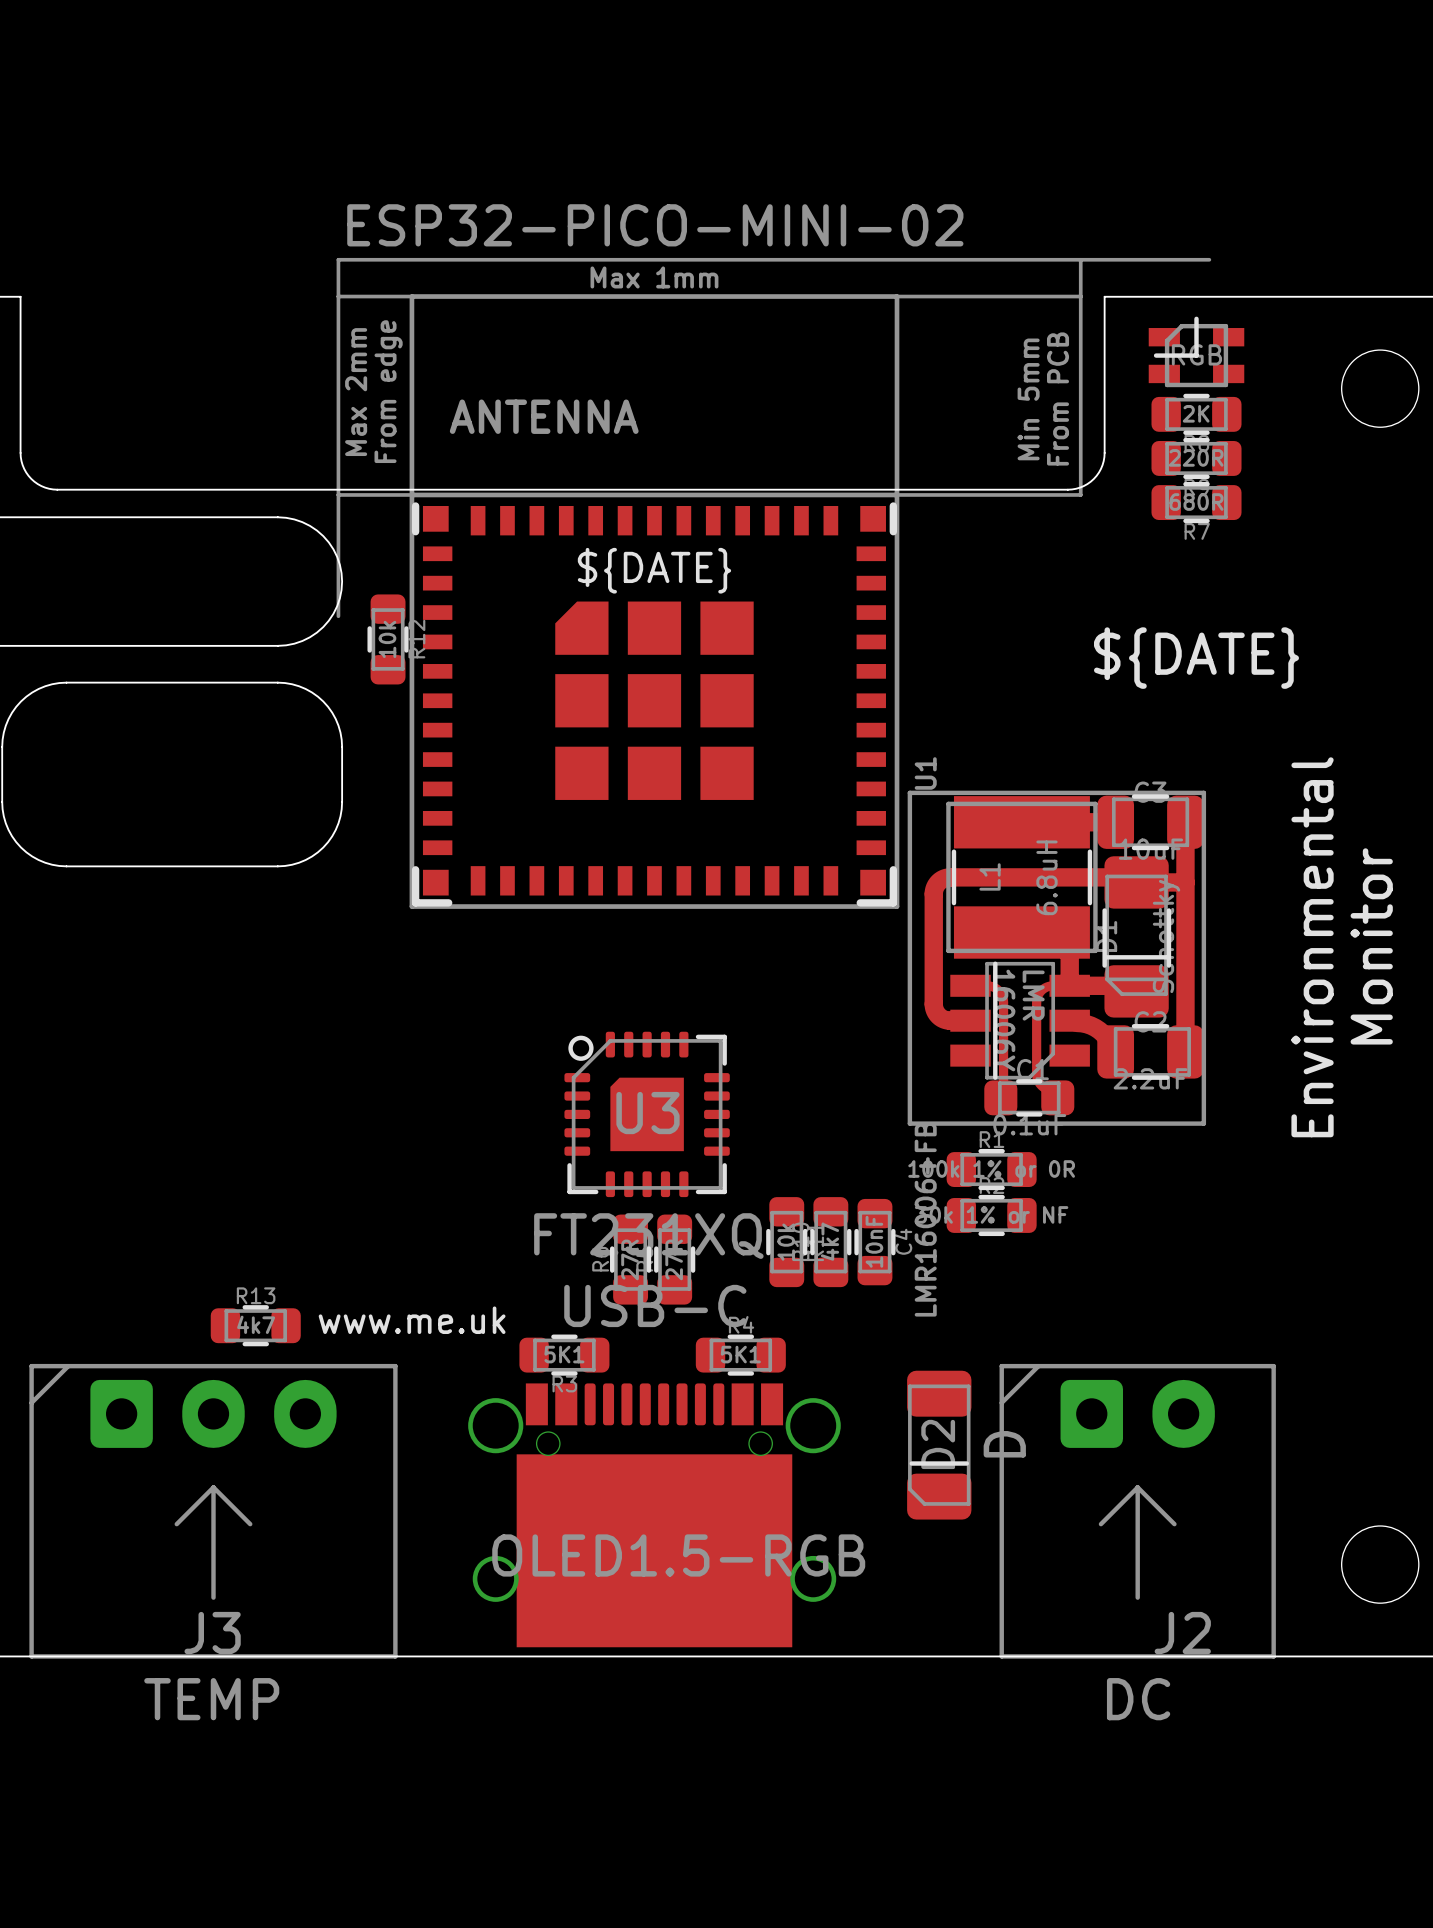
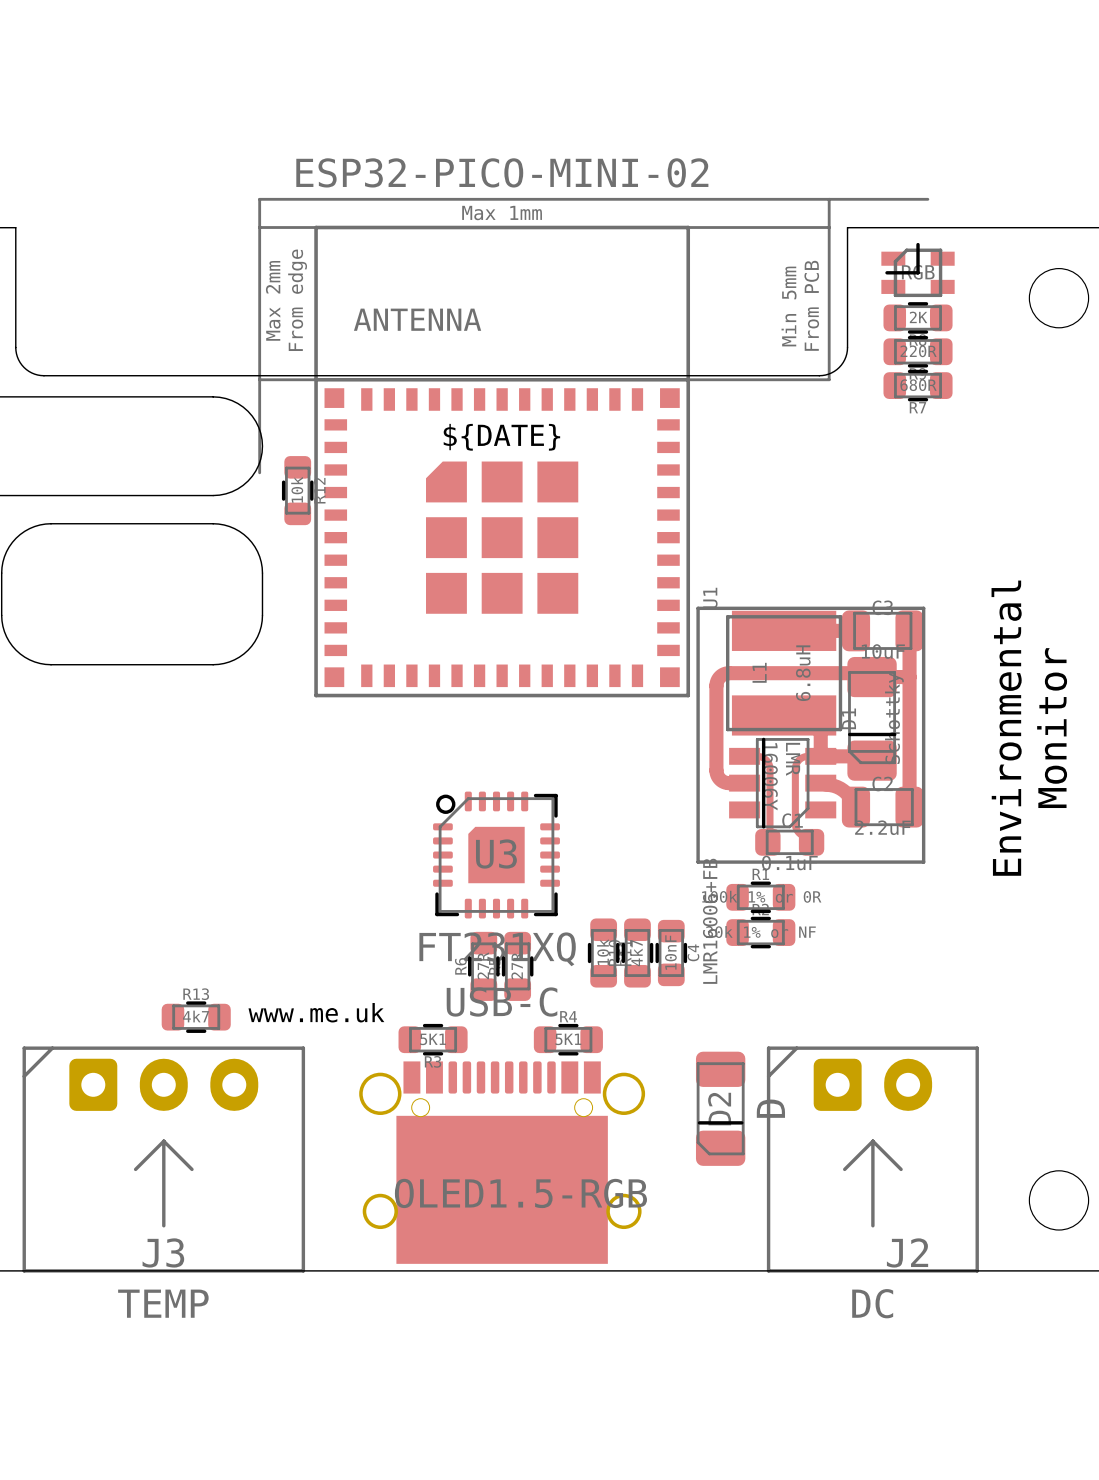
part footprint: [336, 257, 1212, 909] -> [258, 197, 930, 698]
text: ${DATE} (1196, 658) -> none
U1 footprint: [907, 790, 1207, 1126] -> [696, 606, 926, 864]

